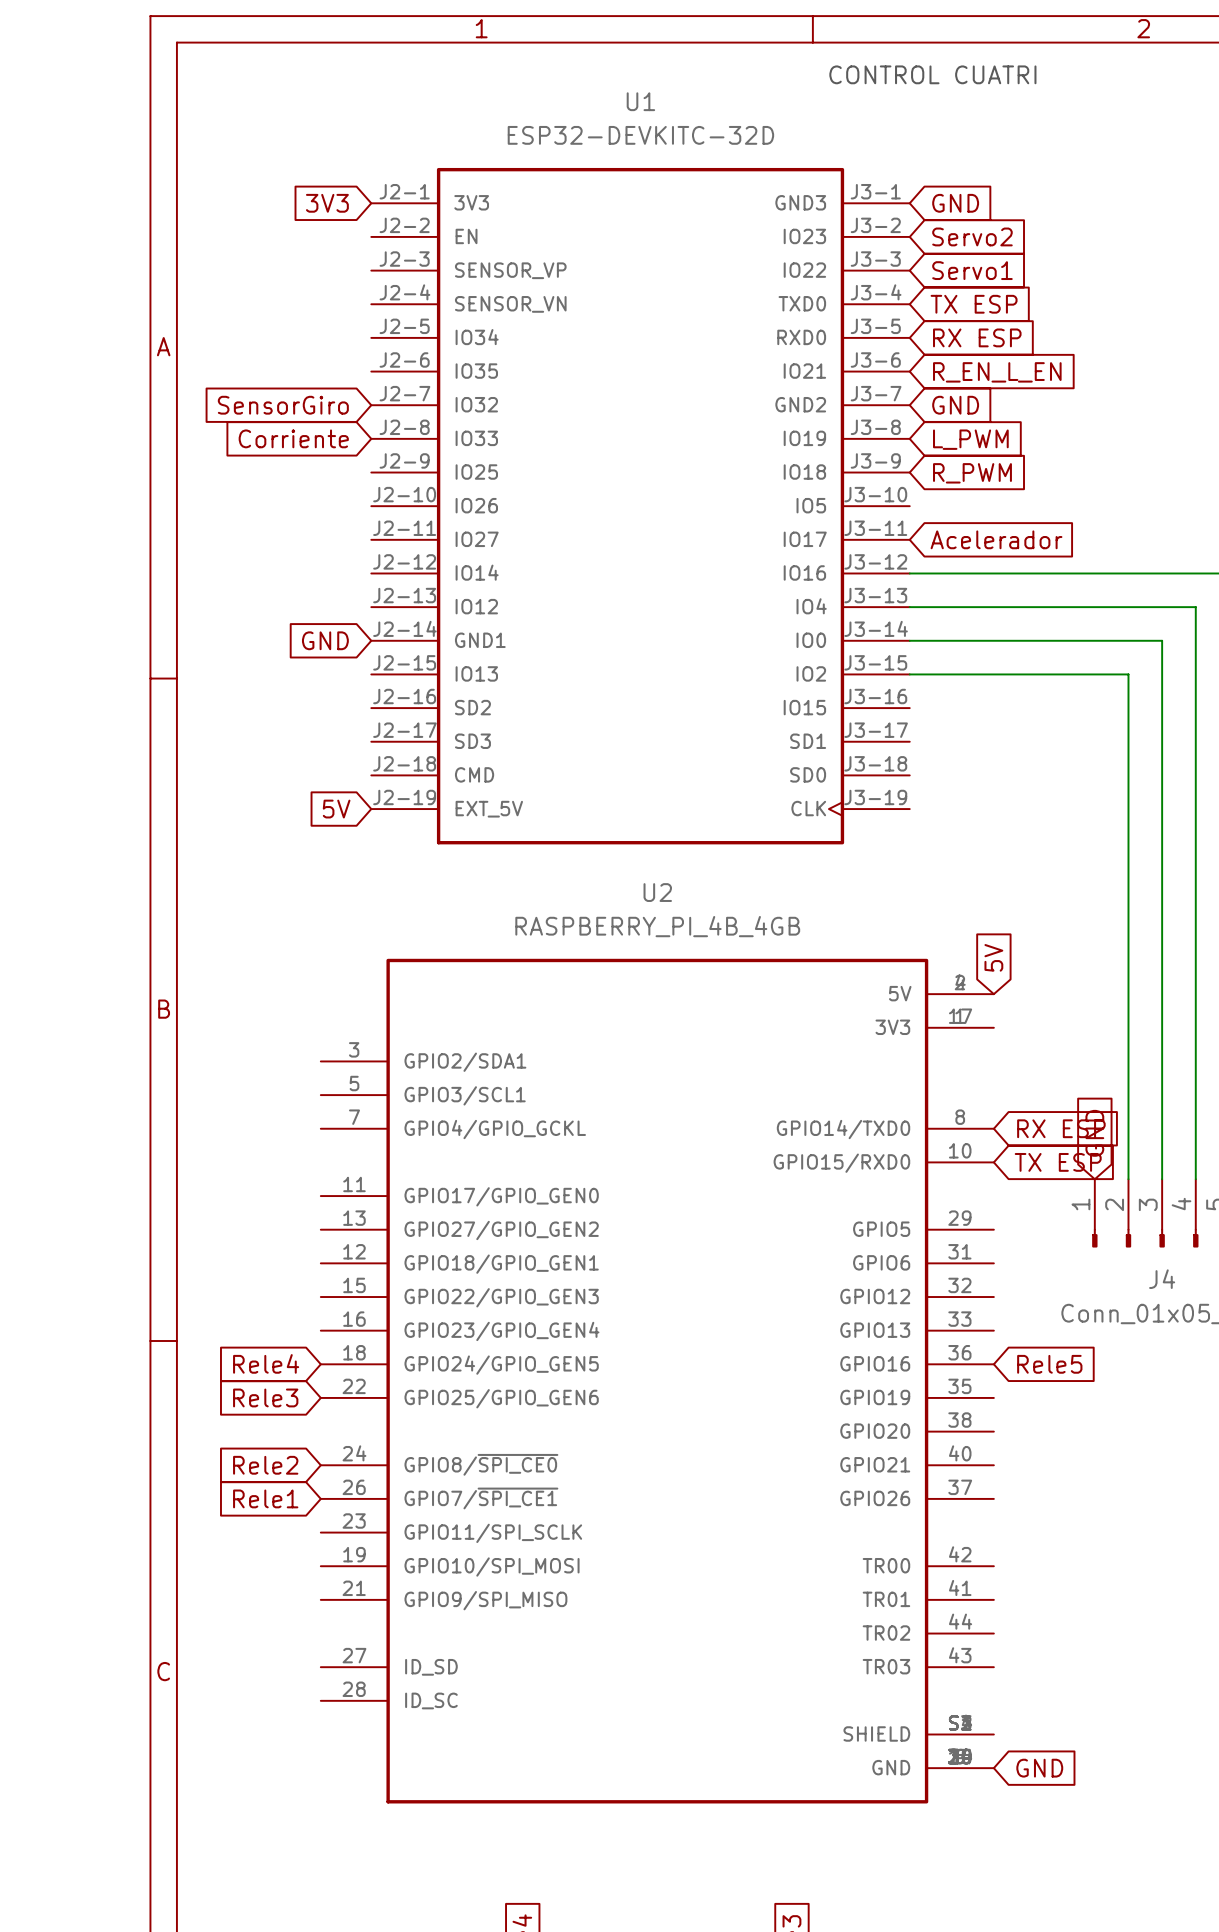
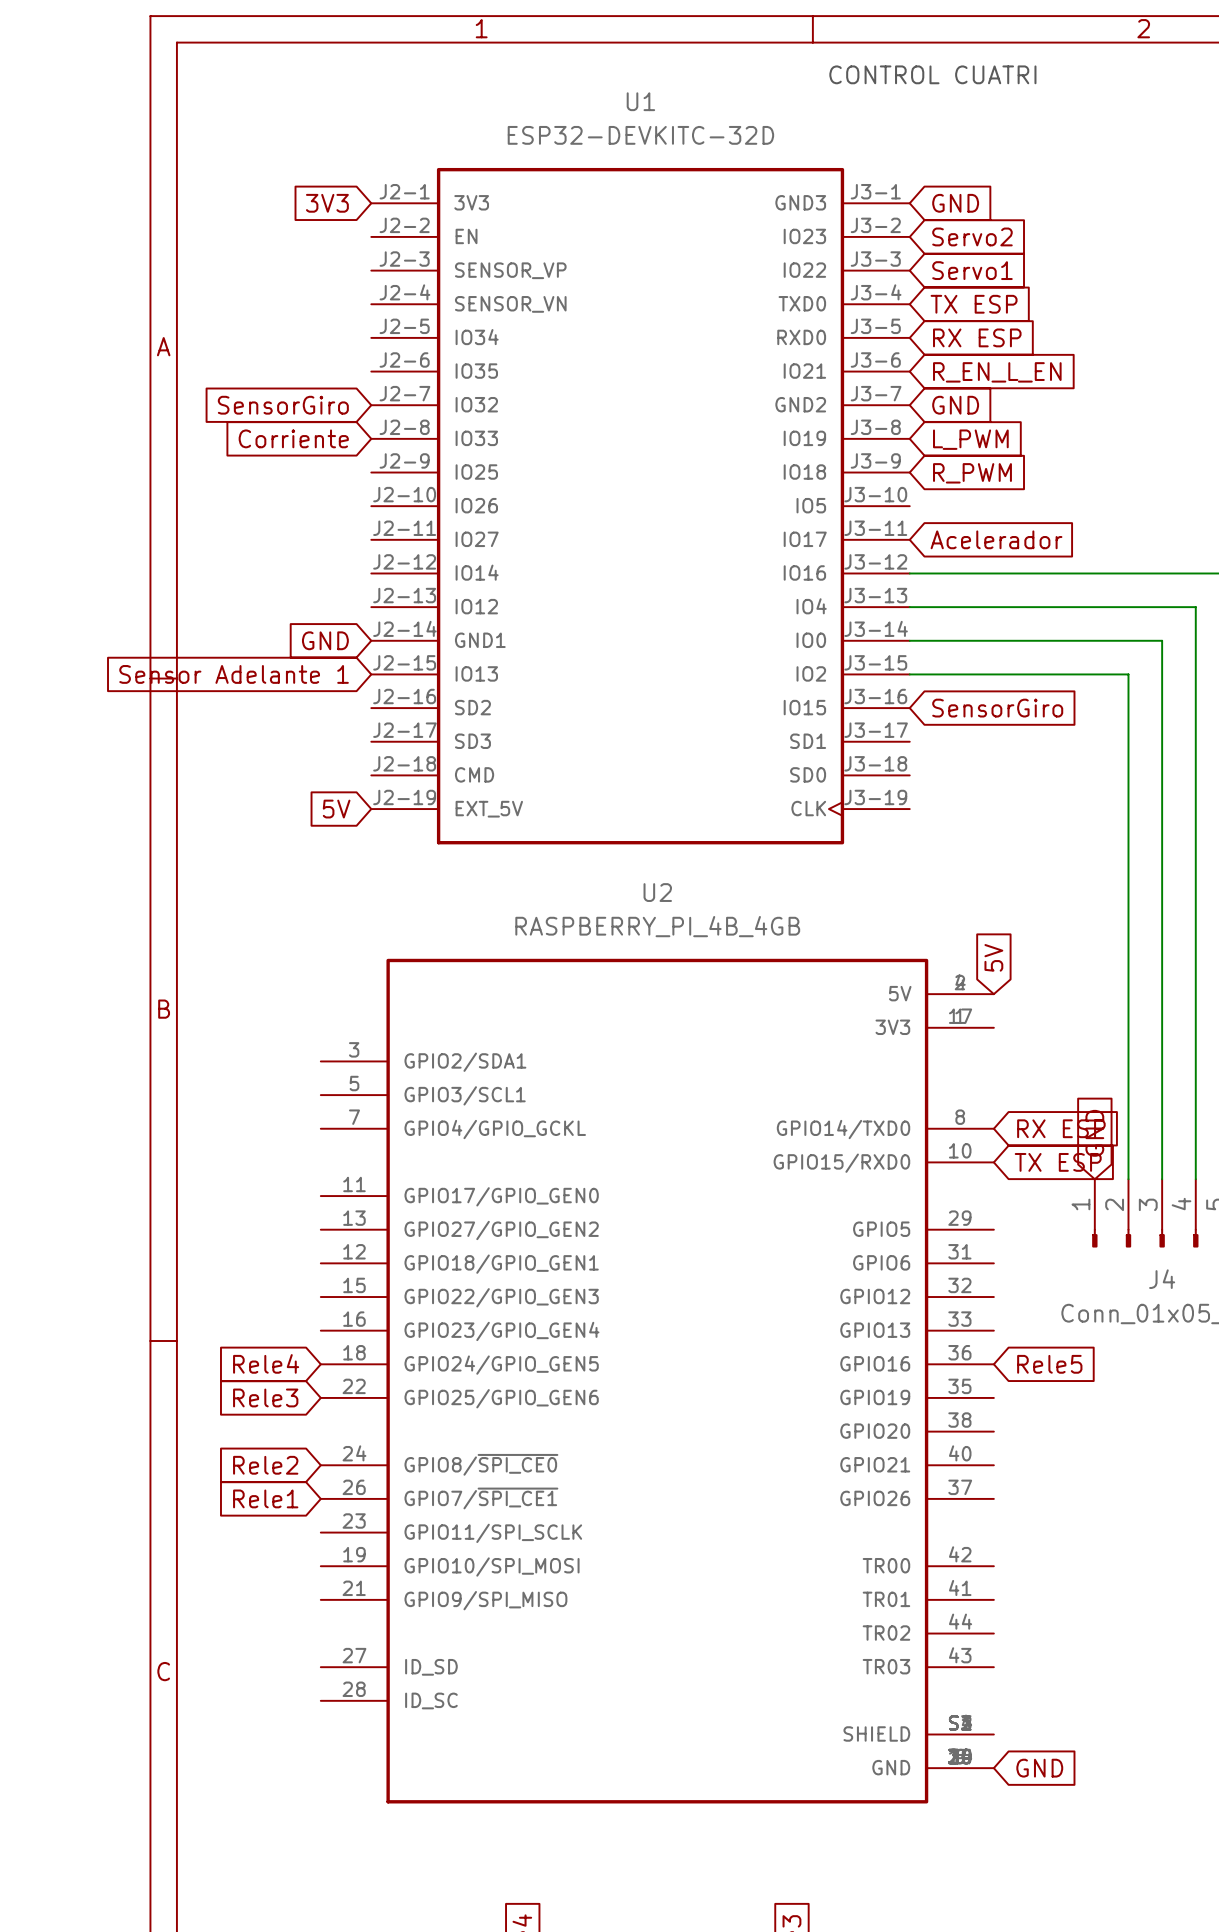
global label: none -> Sensor Adelante 1 (234, 674)
global label: none -> SensorGiro (997, 708)

